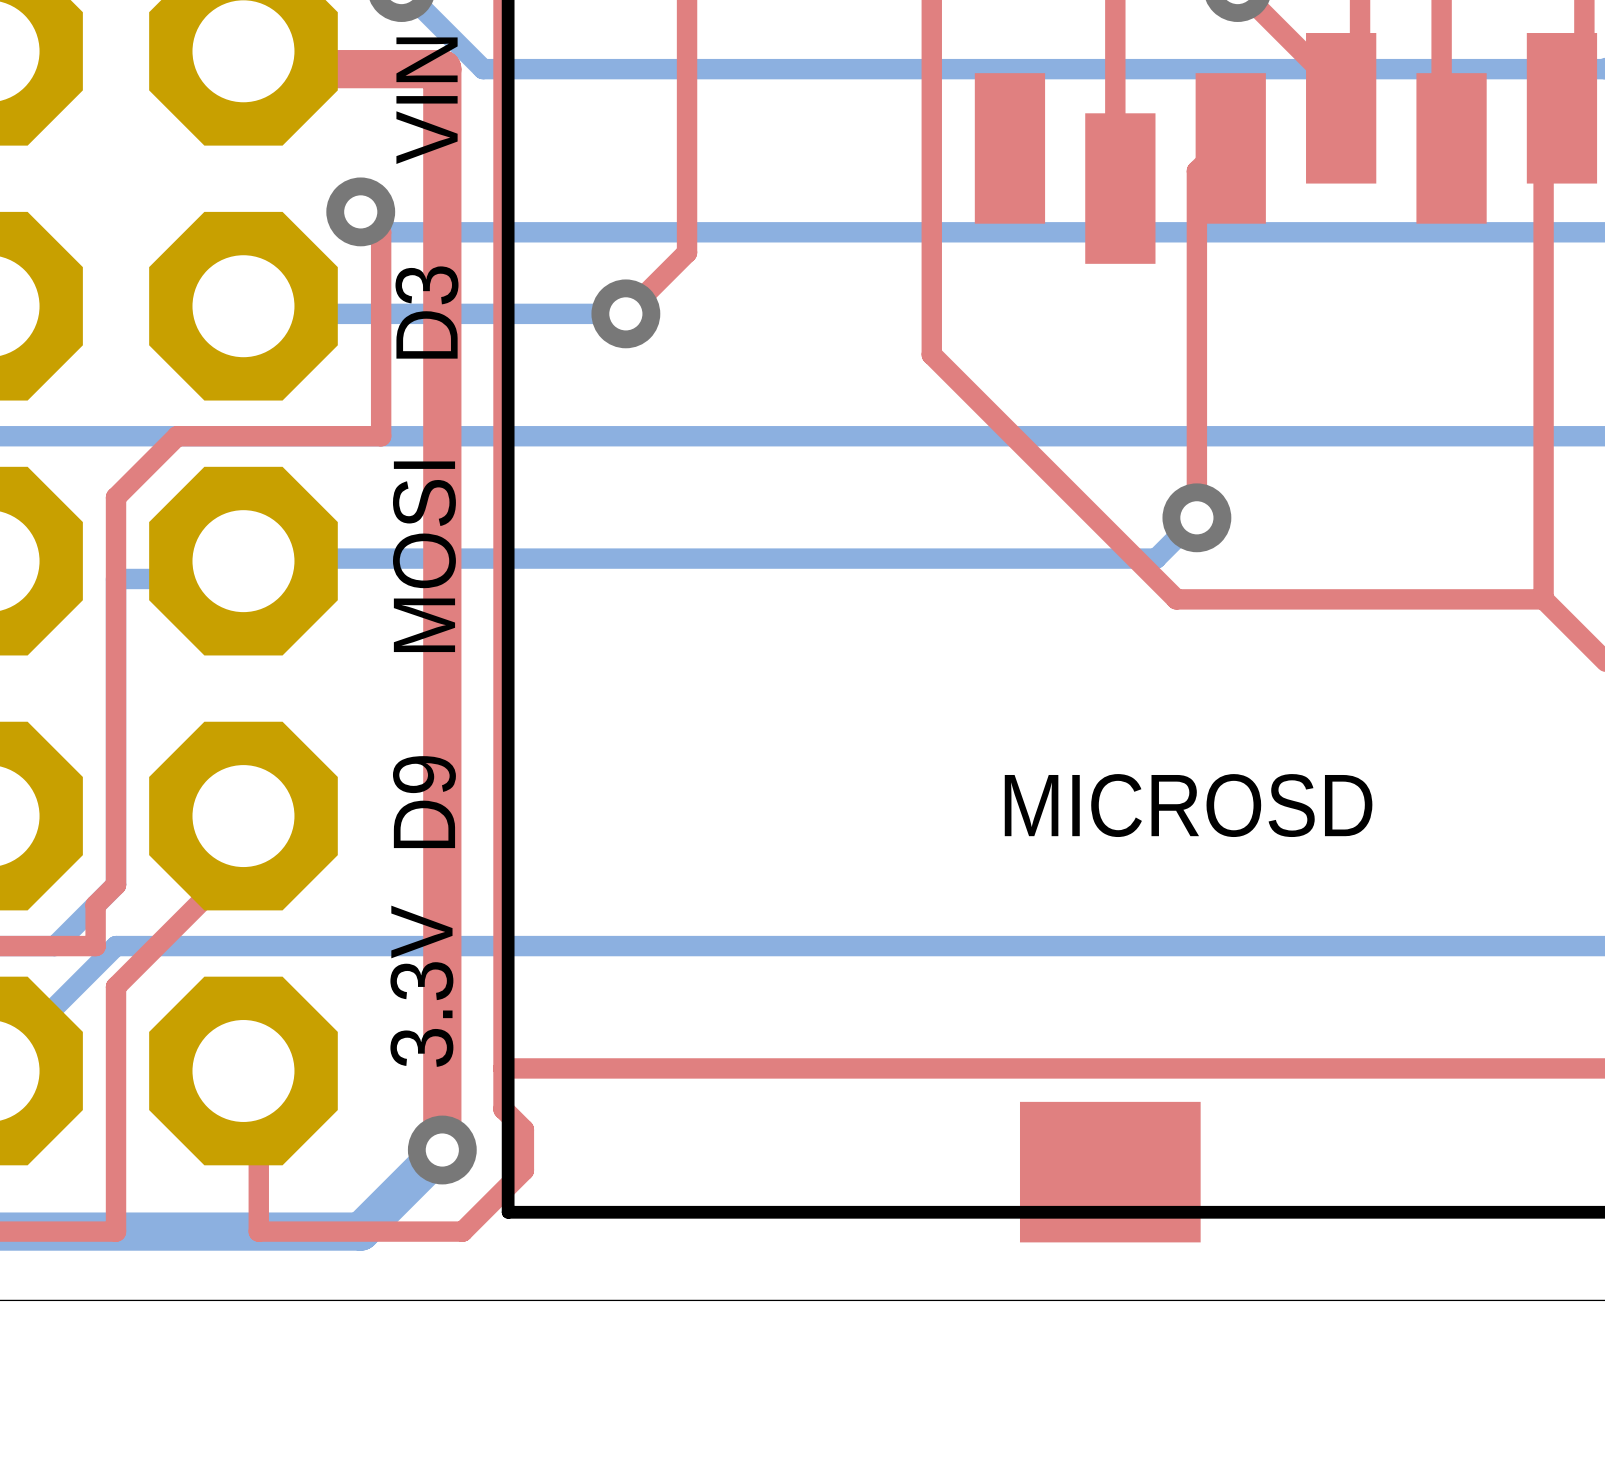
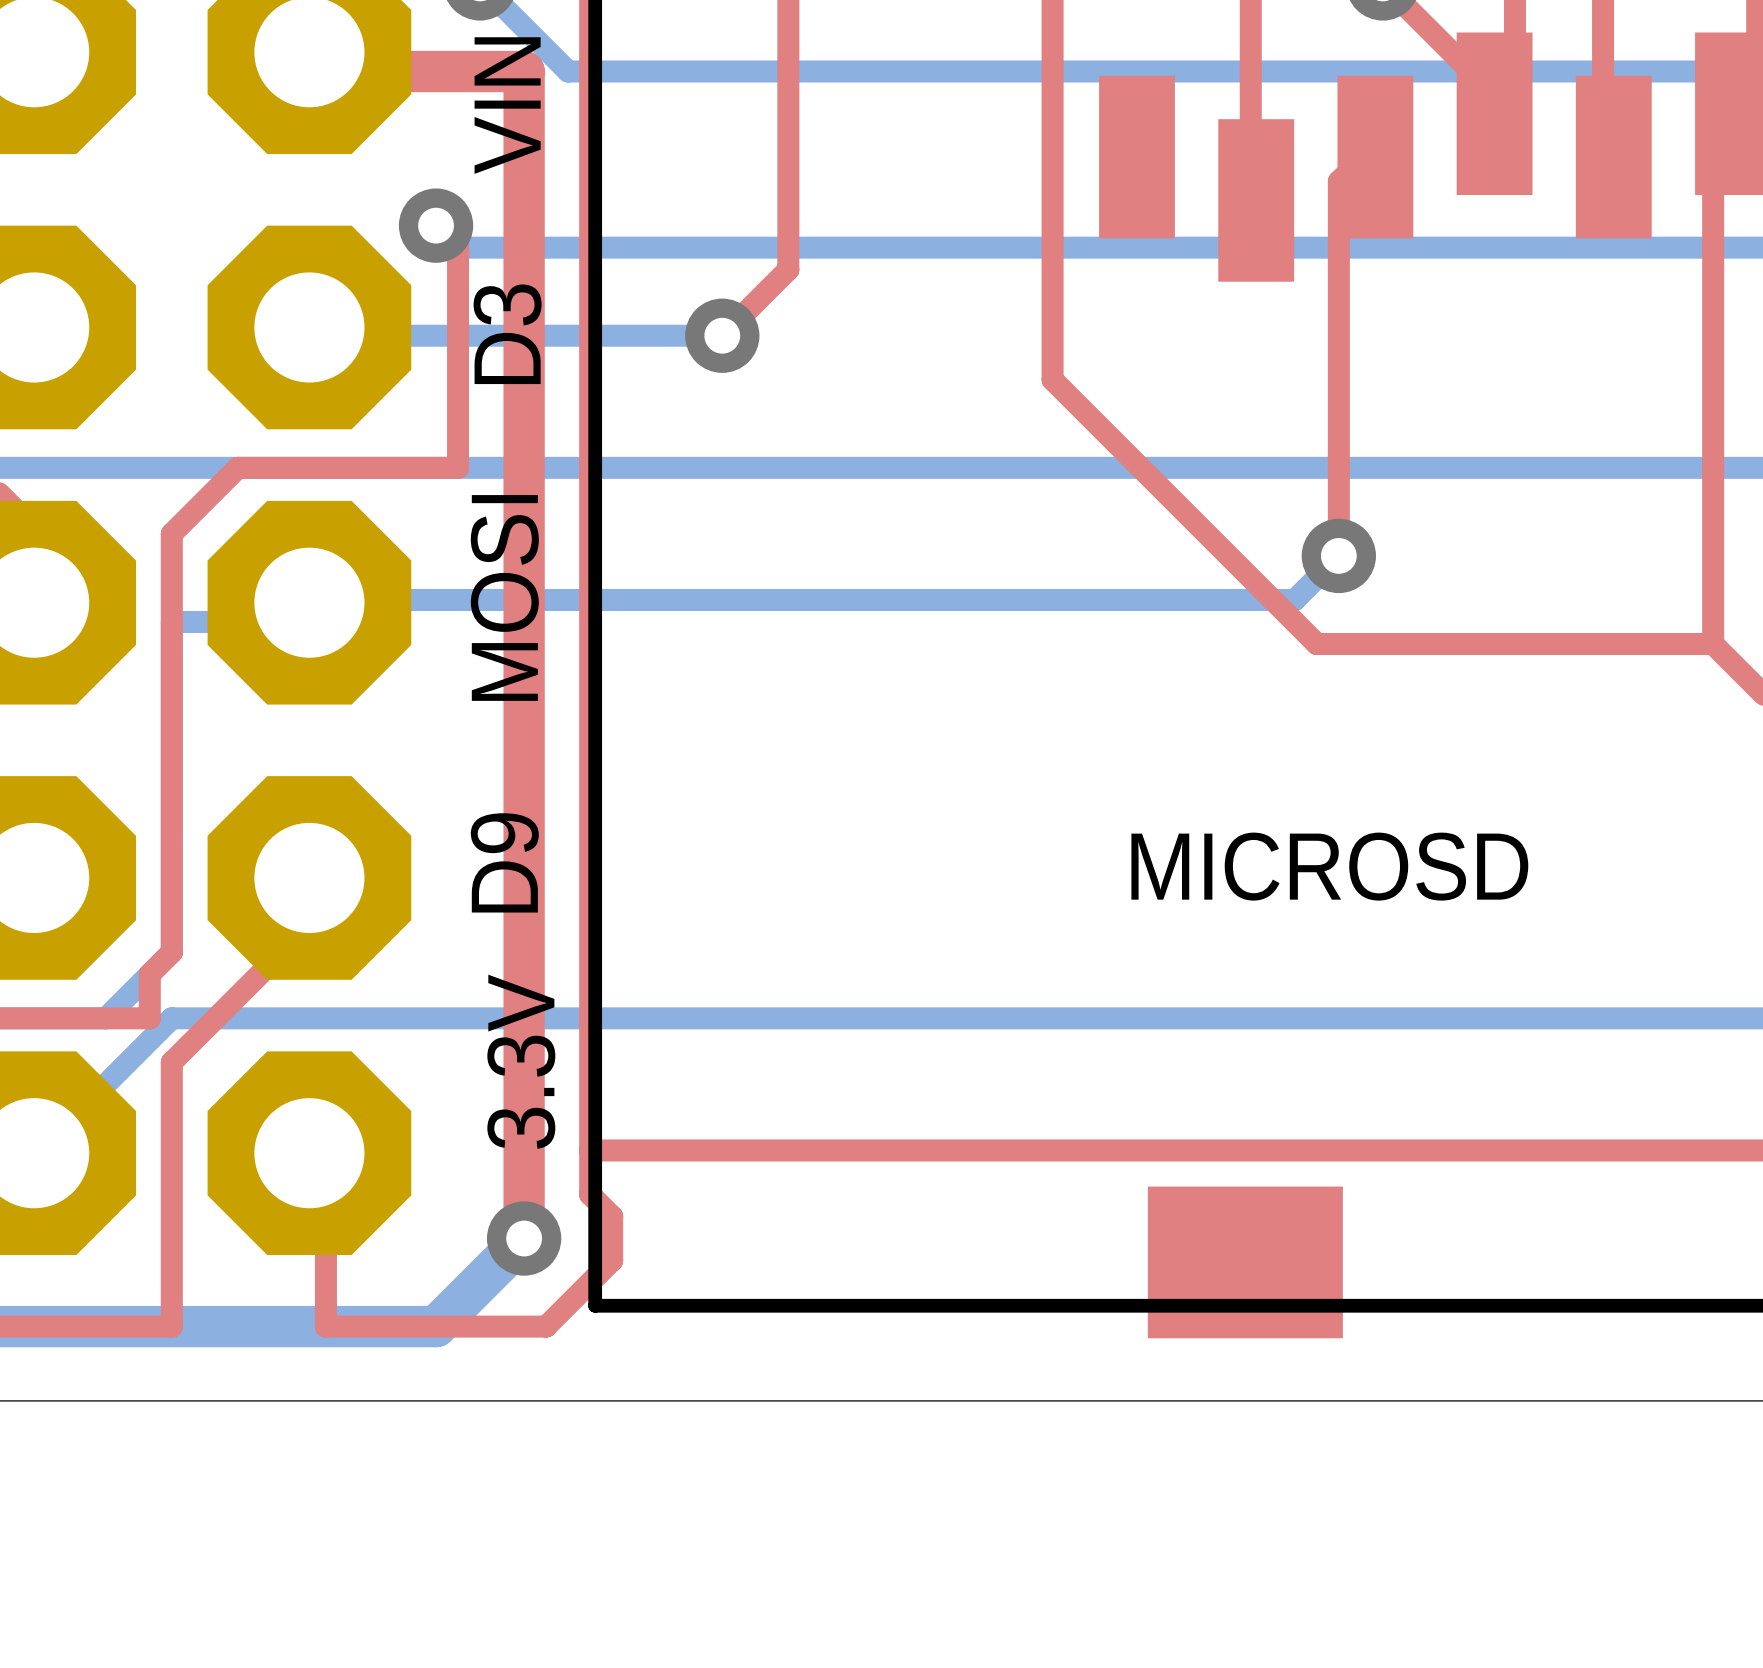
text position: 3.3V (421, 986) -> 3.3V (521, 1061)

